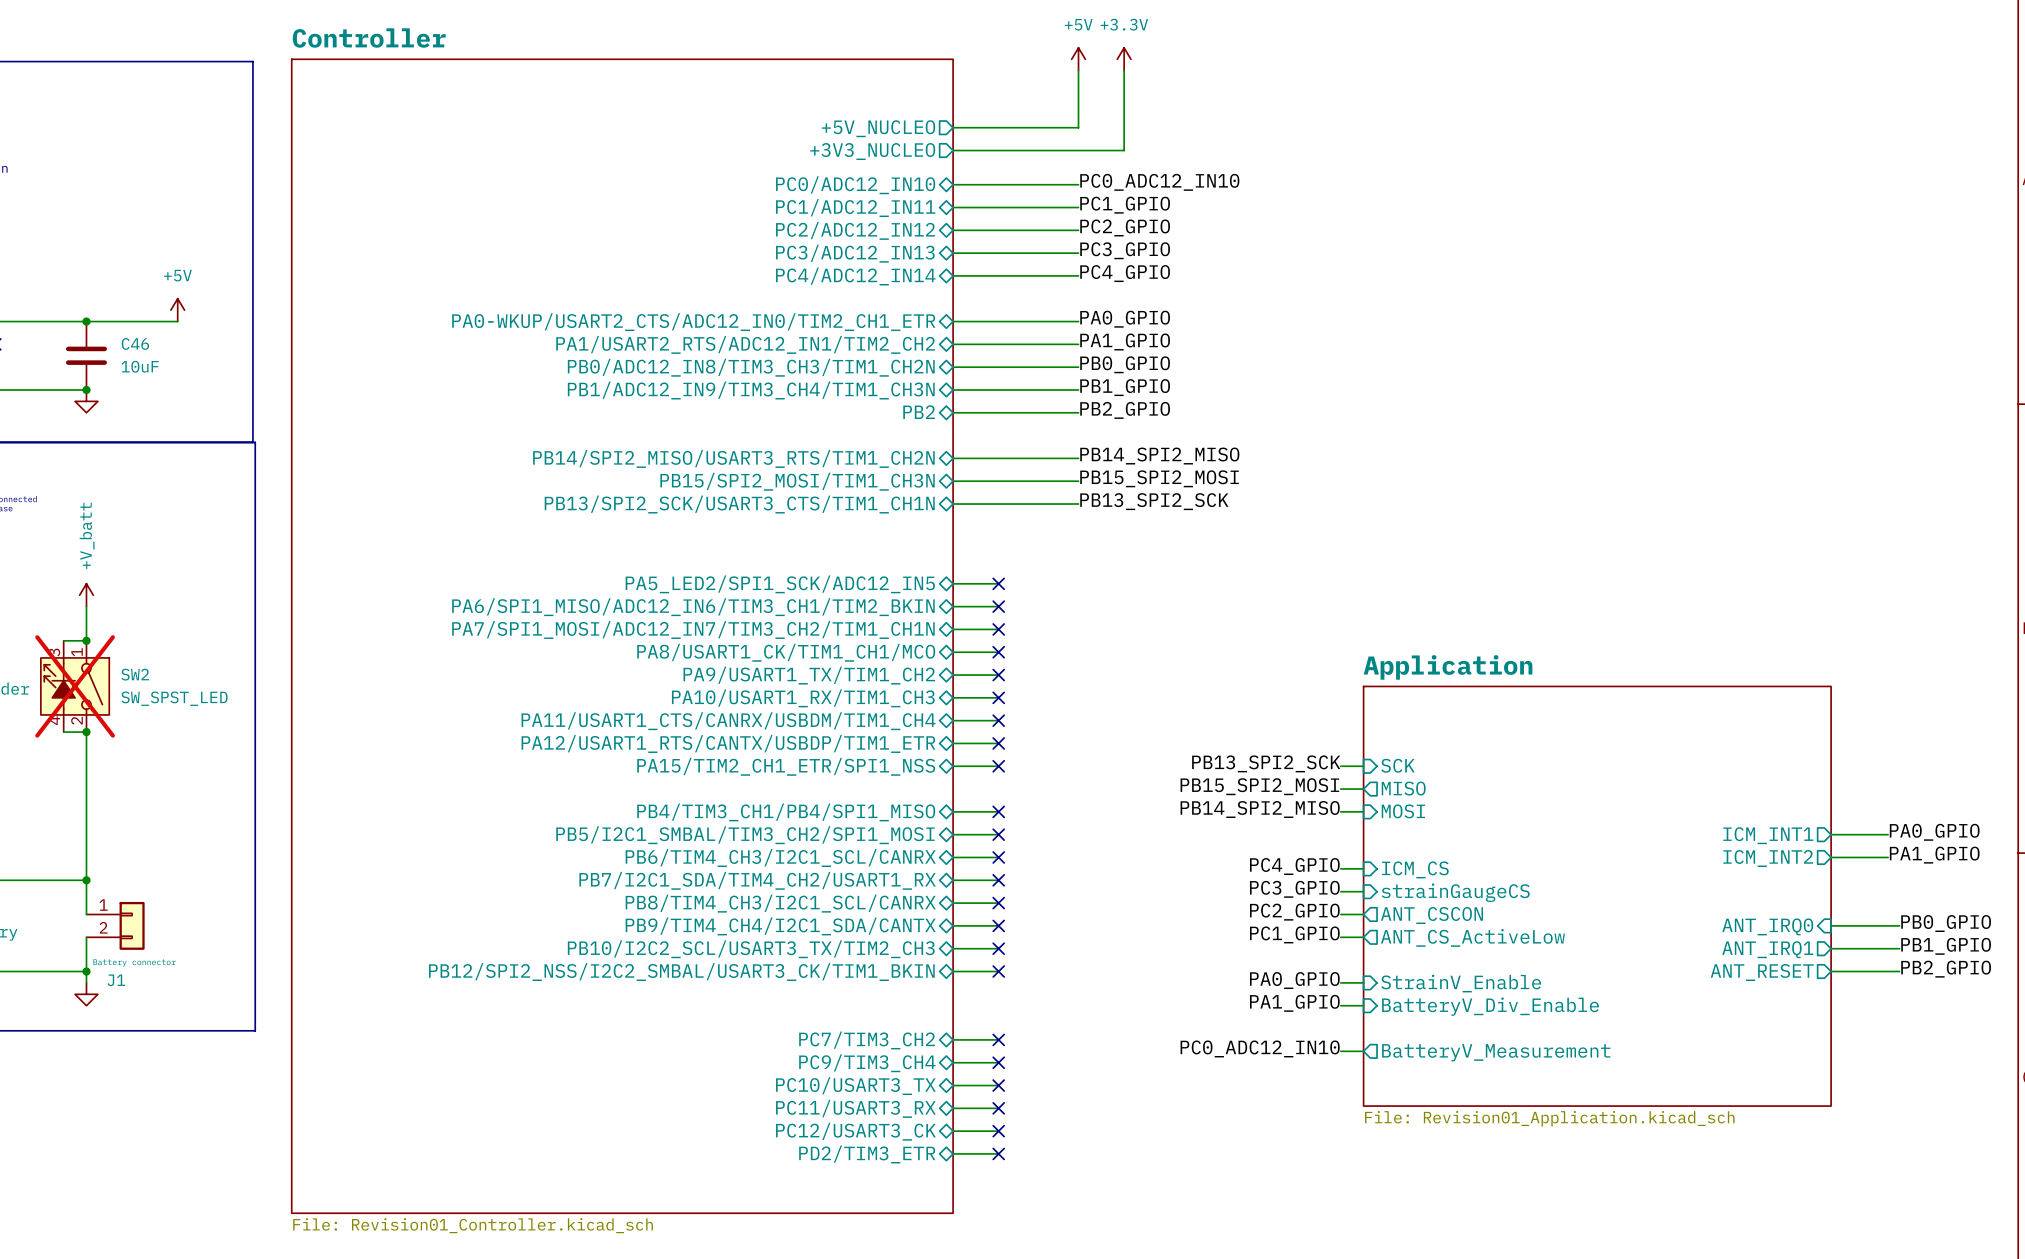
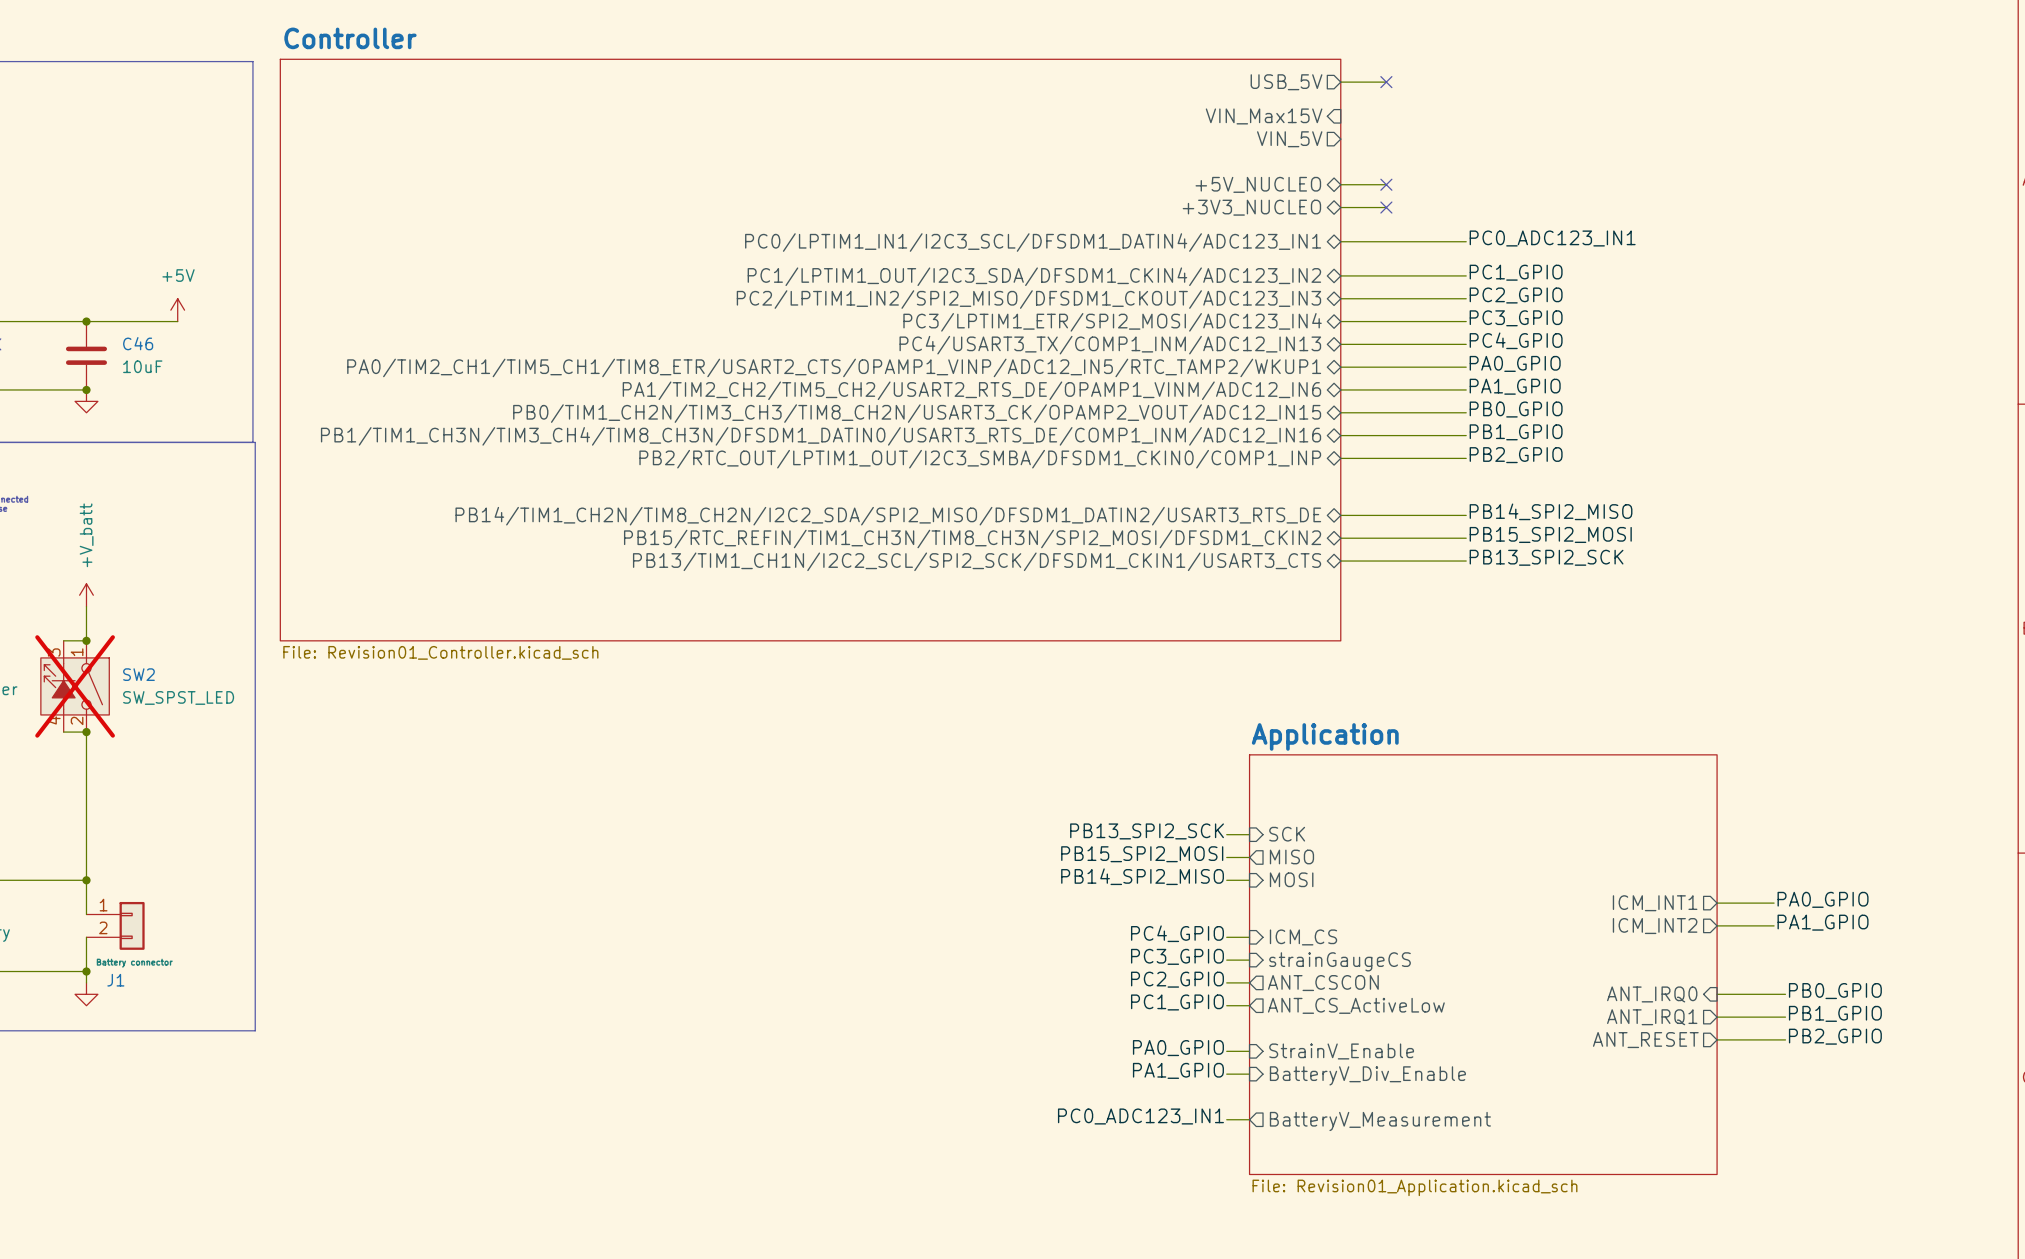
power symbol: +5V (1078, 59) -> none
power symbol: +3.3V (1124, 59) -> none
wire: (1078, 70) (1078, 127) (953, 127) -> none
wire: (1124, 70) (1124, 150) (953, 150) -> none
wire: none -> (1340, 82) (1386, 82)
no-connect mark: none -> (1386, 82)
sheet pin: none -> USB_5V (1286, 82)
sheet pin: none -> VIN_Max15V (1264, 116)
sheet pin: +5V_NUCLEO (878, 128) -> none
sheet pin: none -> VIN_5V (1289, 139)
sheet pin: +3V3_NUCLEO (872, 151) -> none
label: PC0_ADC12_IN10 (1159, 182) -> none
wire: (953, 184) (1078, 184) -> none
wire: none -> (1340, 184) (1386, 184)
no-connect mark: none -> (1386, 184)
sheet pin: PC0/ADC12_IN10 (855, 185) -> none
sheet pin: none -> +5V_NUCLEO (1258, 184)
label: PC1_GPIO (1125, 205) -> none
wire: (953, 207) (1078, 207) -> none
wire: none -> (1340, 207) (1386, 207)
no-connect mark: none -> (1386, 207)
sheet pin: PC1/ADC12_IN11 (855, 208) -> none
sheet pin: none -> +3V3_NUCLEO (1251, 207)
label: PC2_GPIO (1125, 227) -> none
sheet pin: PC2/ADC12_IN12 (855, 230) -> none
wire: (953, 230) (1078, 230) -> none
label: none -> PC0_ADC123_IN1 (1552, 238)
wire: none -> (1340, 241) (1466, 241)
sheet pin: none -> PC0/LPTIM1_IN1/I2C3_SCL/DFSDM1_DATIN4/ADC123_IN1 (1033, 242)
label: PC3_GPIO (1125, 250) -> none
sheet pin: PC3/ADC12_IN13 (855, 253) -> none
wire: (953, 253) (1078, 253) -> none
label: PC4_GPIO (1125, 273) -> none
label: none -> PC1_GPIO (1516, 272)
wire: (953, 275) (1078, 275) -> none
wire: none -> (1340, 275) (1466, 275)
sheet pin: PC4/ADC12_IN14 (855, 276) -> none
sheet pin: none -> PC1/LPTIM1_OUT/I2C3_SDA/DFSDM1_CKIN4/ADC123_IN2 (1034, 276)
label: none -> PC2_GPIO (1516, 295)
wire: none -> (1340, 298) (1466, 298)
sheet pin: none -> PC2/LPTIM1_IN2/SPI2_MISO/DFSDM1_CKOUT/ADC123_IN3 (1028, 299)
label: PA0_GPIO (1125, 319) -> none
label: none -> PC3_GPIO (1516, 318)
wire: (953, 321) (1078, 321) -> none
wire: none -> (1340, 321) (1466, 321)
sheet pin: PA0-WKUP/USART2_CTS/ADC12_IN0/TIM2_CH1_ETR (693, 322) -> none
sheet pin: none -> PC3/LPTIM1_ETR/SPI2_MOSI/ADC123_IN4 (1112, 322)
label: PA1_GPIO (1125, 341) -> none
label: none -> PC4_GPIO (1516, 340)
sheet pin: PA1/USART2_RTS/ADC12_IN1/TIM2_CH2 (745, 344) -> none
wire: (953, 344) (1078, 344) -> none
sheet pin: none -> PC4/USART3_TX/COMP1_INM/ADC12_IN13 (1110, 345)
wire: none -> (1340, 344) (1466, 344)
sheet Controller: none -> File: Revision01_Controller.kicad_sch (810, 350)
label: PB0_GPIO (1125, 364) -> none
label: none -> PA0_GPIO (1515, 363)
sheet pin: PB0/ADC12_IN8/TIM3_CH3/TIM1_CH2N (751, 367) -> none
sheet pin: none -> PA0/TIM2_CH1/TIM5_CH1/TIM8_ETR/USART2_CTS/OPAMP1_VINP/ADC12_IN5/RTC_TAMP2/WKUP1 (834, 367)
wire: (953, 367) (1078, 367) -> none
wire: none -> (1340, 367) (1466, 367)
label: PB1_GPIO (1125, 387) -> none
label: none -> PA1_GPIO (1515, 386)
wire: (953, 389) (1078, 389) -> none
wire: none -> (1340, 389) (1466, 389)
sheet pin: PB1/ADC12_IN9/TIM3_CH4/TIM1_CH3N (751, 390) -> none
sheet pin: none -> PA1/TIM2_CH2/TIM5_CH2/USART2_RTS_DE/OPAMP1_VINM/ADC12_IN6 (971, 390)
label: PB2_GPIO (1125, 410) -> none
label: none -> PB0_GPIO (1516, 409)
sheet pin: PB2 (919, 412) -> none
wire: (953, 412) (1078, 412) -> none
wire: none -> (1340, 412) (1466, 412)
sheet pin: none -> PB0/TIM1_CH2N/TIM3_CH3/TIM8_CH2N/USART3_CK/OPAMP2_VOUT/ADC12_IN15 (917, 413)
label: none -> PB1_GPIO (1516, 432)
wire: none -> (1340, 435) (1466, 435)
sheet pin: none -> PB1/TIM1_CH3N/TIM3_CH4/TIM8_CH3N/DFSDM1_DATIN0/USART3_RTS_DE/COMP1_INM/ADC12_IN16 (821, 436)
label: PB14_SPI2_MISO (1159, 456) -> none
label: none -> PB2_GPIO (1516, 455)
sheet pin: PB14/SPI2_MISO/USART3_RTS/TIM1_CH2N (733, 458) -> none
wire: (953, 458) (1078, 458) -> none
sheet pin: none -> PB2/RTC_OUT/LPTIM1_OUT/I2C3_SMBA/DFSDM1_CKIN0/COMP1_INP (980, 459)
wire: none -> (1340, 458) (1466, 458)
label: PB15_SPI2_MOSI (1159, 478) -> none
sheet pin: PB15/SPI2_MOSI/TIM1_CH3N (797, 481) -> none
wire: (953, 481) (1078, 481) -> none
label: PB13_SPI2_SCK (1154, 501) -> none
sheet pin: PB13/SPI2_SCK/USART3_CTS/TIM1_CH1N (739, 504) -> none
wire: (953, 504) (1078, 504) -> none
label: none -> PB14_SPI2_MISO (1551, 511)
sheet pin: none -> PB14/TIM1_CH2N/TIM8_CH2N/I2C2_SDA/SPI2_MISO/DFSDM1_DATIN2/USART3_RTS_DE (888, 516)
wire: none -> (1340, 515) (1466, 515)
label: none -> PB15_SPI2_MOSI (1550, 534)
sheet pin: none -> PB15/RTC_REFIN/TIM1_CH3N/TIM8_CH3N/SPI2_MOSI/DFSDM1_CKIN2 (972, 538)
wire: none -> (1340, 538) (1466, 538)
label: none -> PB13_SPI2_SCK (1546, 557)
sheet pin: none -> PB13/TIM1_CH1N/I2C2_SCL/SPI2_SCK/DFSDM1_CKIN1/USART3_CTS (977, 561)
wire: none -> (1340, 561) (1466, 561)
wire: (953, 583) (998, 583) -> none
no-connect mark: (998, 583) -> none
sheet pin: PA5_LED2/SPI1_SCK/ADC12_IN5 (780, 584) -> none
wire: (953, 606) (998, 606) -> none
no-connect mark: (998, 606) -> none
sheet pin: PA6/SPI1_MISO/ADC12_IN6/TIM3_CH1/TIM2_BKIN (693, 607) -> none
sheet pin: PA7/SPI1_MOSI/ADC12_IN7/TIM3_CH2/TIM1_CH1N (693, 629) -> none
wire: (953, 629) (998, 629) -> none
no-connect mark: (998, 629) -> none
sheet Controller: File: Revision01_Controller.kicad_sch (622, 636) -> none
sheet pin: PA8/USART1_CK/TIM1_CH1/MCO (786, 652) -> none
wire: (953, 652) (998, 652) -> none
no-connect mark: (998, 652) -> none
sheet pin: PA9/USART1_TX/TIM1_CH2 (809, 675) -> none
wire: (953, 675) (998, 675) -> none
no-connect mark: (998, 675) -> none
wire: (953, 697) (998, 697) -> none
no-connect mark: (998, 697) -> none
sheet pin: PA10/USART1_RX/TIM1_CH3 (803, 698) -> none
wire: (953, 720) (998, 720) -> none
no-connect mark: (998, 720) -> none
sheet pin: PA11/USART1_CTS/CANRX/USBDM/TIM1_CH4 (728, 721) -> none
sheet pin: PA12/USART1_RTS/CANTX/USBDP/TIM1_ETR (728, 743) -> none
wire: (953, 743) (998, 743) -> none
no-connect mark: (998, 743) -> none
label: PB13_SPI2_SCK (1266, 763) -> none
sheet pin position: SCK (1397, 765) -> SCK (1287, 834)
sheet pin: PA15/TIM2_CH1_ETR/SPI1_NSS (786, 766) -> none
wire: (953, 766) (998, 766) -> none
no-connect mark: (998, 766) -> none
wire: (1340, 766) (1363, 766) -> (1226, 834) (1249, 834)
label position: PB15_SPI2_MOSI (1259, 786) -> PB15_SPI2_MOSI (1142, 854)
sheet pin position: MISO (1403, 788) -> MISO (1291, 856)
wire: (1340, 789) (1363, 789) -> (1226, 857) (1249, 857)
label position: PB14_SPI2_MISO (1260, 809) -> PB14_SPI2_MISO (1142, 876)
wire: (953, 811) (998, 811) -> none
no-connect mark: (998, 811) -> none
wire: (1340, 811) (1363, 811) -> (1226, 880) (1249, 880)
sheet pin position: MOSI (1403, 811) -> MOSI (1291, 879)
sheet pin: PB4/TIM3_CH1/PB4/SPI1_MISO (786, 812) -> none
label: none -> PB13_SPI2_SCK (1147, 831)
label position: PA0_GPIO (1934, 832) -> PA0_GPIO (1823, 899)
wire: (953, 834) (998, 834) -> none
no-connect mark: (998, 834) -> none
wire: (1831, 834) (1888, 834) -> (1717, 903) (1774, 903)
sheet pin: PB5/I2C1_SMBAL/TIM3_CH2/SPI1_MOSI (745, 835) -> none
sheet pin position: ICM_INT1 (1768, 835) -> ICM_INT1 (1655, 903)
label position: PA1_GPIO (1934, 855) -> PA1_GPIO (1823, 922)
wire: (953, 857) (998, 857) -> none
no-connect mark: (998, 857) -> none
wire: (1831, 857) (1888, 857) -> (1717, 925) (1774, 925)
sheet pin: PB6/TIM4_CH3/I2C1_SCL/CANRX (780, 858) -> none
sheet pin position: ICM_INT2 (1768, 858) -> ICM_INT2 (1655, 926)
label position: PC4_GPIO (1294, 866) -> PC4_GPIO (1177, 933)
wire: (1340, 868) (1363, 868) -> (1226, 937) (1249, 937)
sheet pin position: ICM_CS (1415, 869) -> ICM_CS (1303, 937)
sheet pin: PB7/I2C1_SDA/TIM4_CH2/USART1_RX (757, 880) -> none
wire: (953, 880) (998, 880) -> none
no-connect mark: (998, 880) -> none
label position: PC3_GPIO (1294, 889) -> PC3_GPIO (1177, 956)
wire: (1340, 891) (1363, 891) -> (1226, 960) (1249, 960)
sheet pin position: strainGaugeCS (1455, 892) -> strainGaugeCS (1340, 961)
sheet Application position: (1597, 896) -> (1483, 964)
sheet pin: PB8/TIM4_CH3/I2C1_SCL/CANRX (780, 903) -> none
wire: (953, 903) (998, 903) -> none
no-connect mark: (998, 903) -> none
label position: PC2_GPIO (1294, 912) -> PC2_GPIO (1177, 979)
wire: (1340, 914) (1363, 914) -> (1226, 982) (1249, 982)
sheet pin position: ANT_CSCON (1432, 915) -> ANT_CSCON (1323, 983)
label position: PB0_GPIO (1946, 923) -> PB0_GPIO (1835, 991)
wire: (953, 925) (998, 925) -> none
no-connect mark: (998, 925) -> none
wire: (1831, 925) (1899, 925) -> (1717, 994) (1785, 994)
sheet pin: PB9/TIM4_CH4/I2C1_SDA/CANTX (780, 926) -> none
sheet pin position: ANT_IRQ0 (1767, 926) -> ANT_IRQ0 (1652, 994)
label position: PC1_GPIO (1294, 934) -> PC1_GPIO (1177, 1002)
wire: (1340, 937) (1363, 937) -> (1226, 1005) (1249, 1005)
sheet pin position: ANT_CS_ActiveLow (1472, 937) -> ANT_CS_ActiveLow (1356, 1005)
label position: PB1_GPIO (1946, 946) -> PB1_GPIO (1835, 1013)
wire: (953, 948) (998, 948) -> none
no-connect mark: (998, 948) -> none
wire: (1831, 948) (1899, 948) -> (1717, 1017) (1785, 1017)
sheet pin: PB10/I2C2_SCL/USART3_TX/TIM2_CH3 (751, 949) -> none
sheet pin position: ANT_IRQ1 (1767, 949) -> ANT_IRQ1 (1652, 1017)
label position: PB2_GPIO (1946, 969) -> PB2_GPIO (1835, 1036)
wire: (953, 971) (998, 971) -> none
no-connect mark: (998, 971) -> none
wire: (1831, 971) (1899, 971) -> (1717, 1039) (1785, 1039)
sheet pin: PB12/SPI2_NSS/I2C2_SMBAL/USART3_CK/TIM1_BKIN (681, 972) -> none
sheet pin position: ANT_RESET (1762, 972) -> ANT_RESET (1645, 1040)
label position: PA0_GPIO (1294, 980) -> PA0_GPIO (1178, 1048)
wire: (1340, 982) (1363, 982) -> (1226, 1051) (1249, 1051)
sheet pin position: StrainV_Enable (1461, 983) -> StrainV_Enable (1341, 1051)
label position: PA1_GPIO (1294, 1003) -> PA1_GPIO (1178, 1070)
wire: (1340, 1005) (1363, 1005) -> (1226, 1074) (1249, 1074)
sheet pin position: BatteryV_Div_Enable (1490, 1006) -> BatteryV_Div_Enable (1367, 1075)
wire: (953, 1039) (998, 1039) -> none
no-connect mark: (998, 1039) -> none
sheet pin: PC7/TIM3_CH2 (867, 1040) -> none
label: PC0_ADC12_IN10 (1260, 1048) -> none
wire: (1340, 1051) (1363, 1051) -> (1226, 1119) (1249, 1119)
sheet pin position: BatteryV_Measurement (1496, 1052) -> BatteryV_Measurement (1380, 1121)
wire: (953, 1062) (998, 1062) -> none
no-connect mark: (998, 1062) -> none
sheet pin: PC9/TIM3_CH4 (867, 1063) -> none
wire: (953, 1085) (998, 1085) -> none
no-connect mark: (998, 1085) -> none
sheet pin: PC10/USART3_TX (855, 1086) -> none
sheet pin: PC11/USART3_RX (855, 1108) -> none
wire: (953, 1108) (998, 1108) -> none
no-connect mark: (998, 1108) -> none
label: none -> PC0_ADC123_IN1 (1140, 1116)
sheet pin: PC12/USART3_CK (855, 1131) -> none
wire: (953, 1131) (998, 1131) -> none
no-connect mark: (998, 1131) -> none
wire: (953, 1153) (998, 1153) -> none
no-connect mark: (998, 1153) -> none
sheet pin: PD2/TIM3_ETR (867, 1154) -> none

